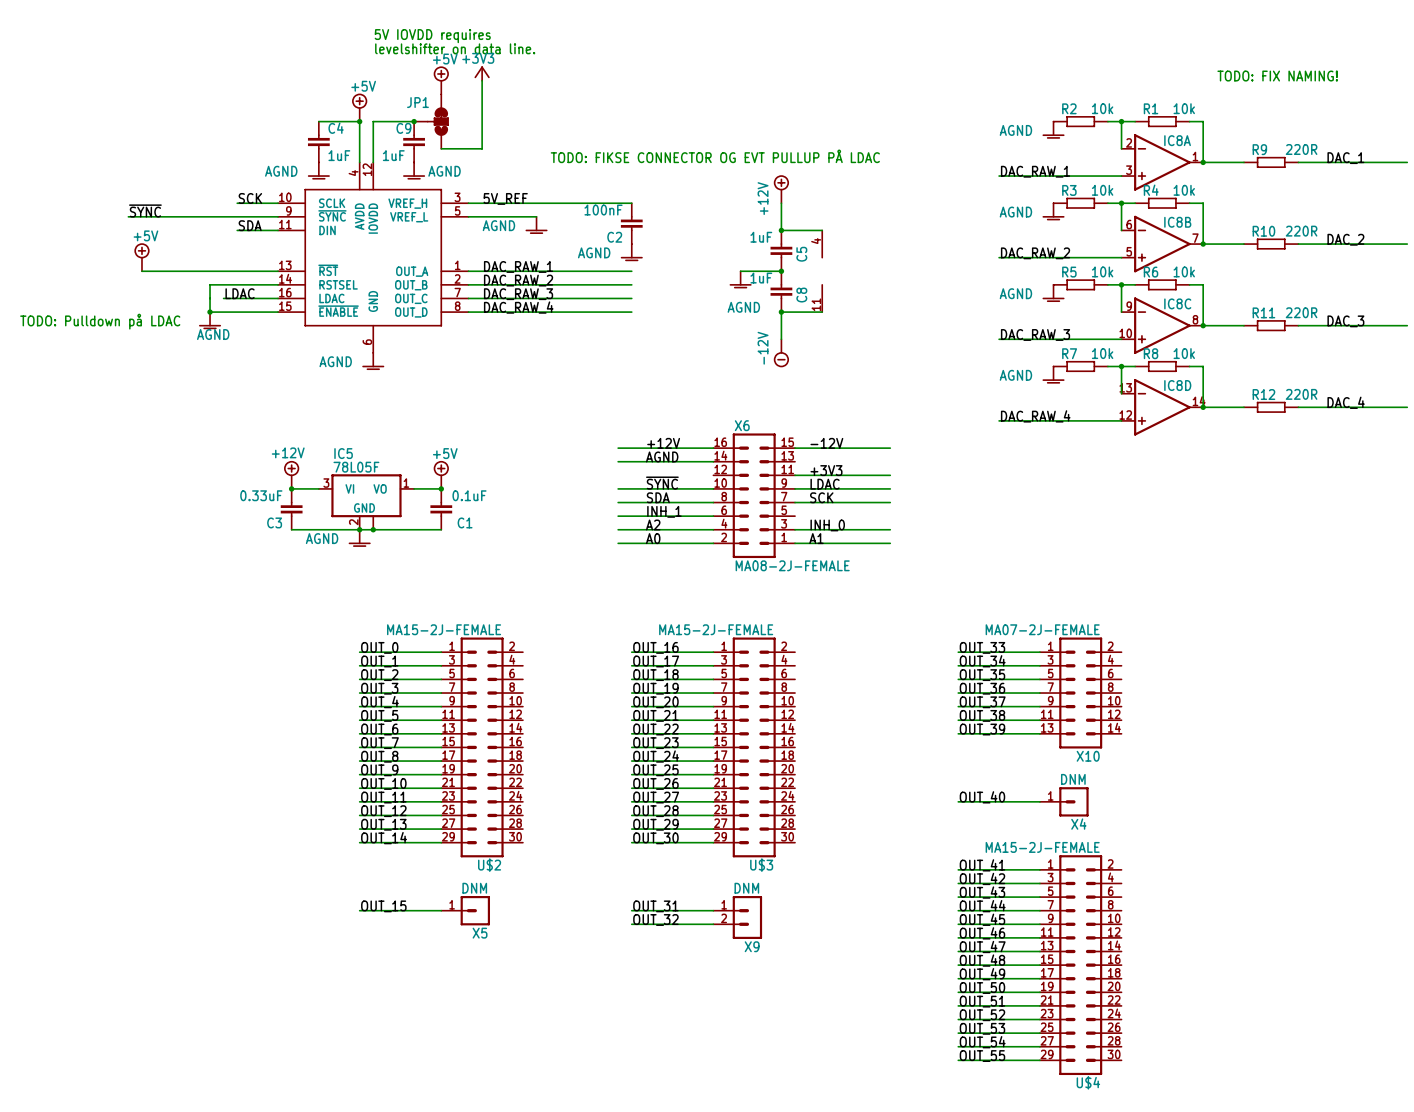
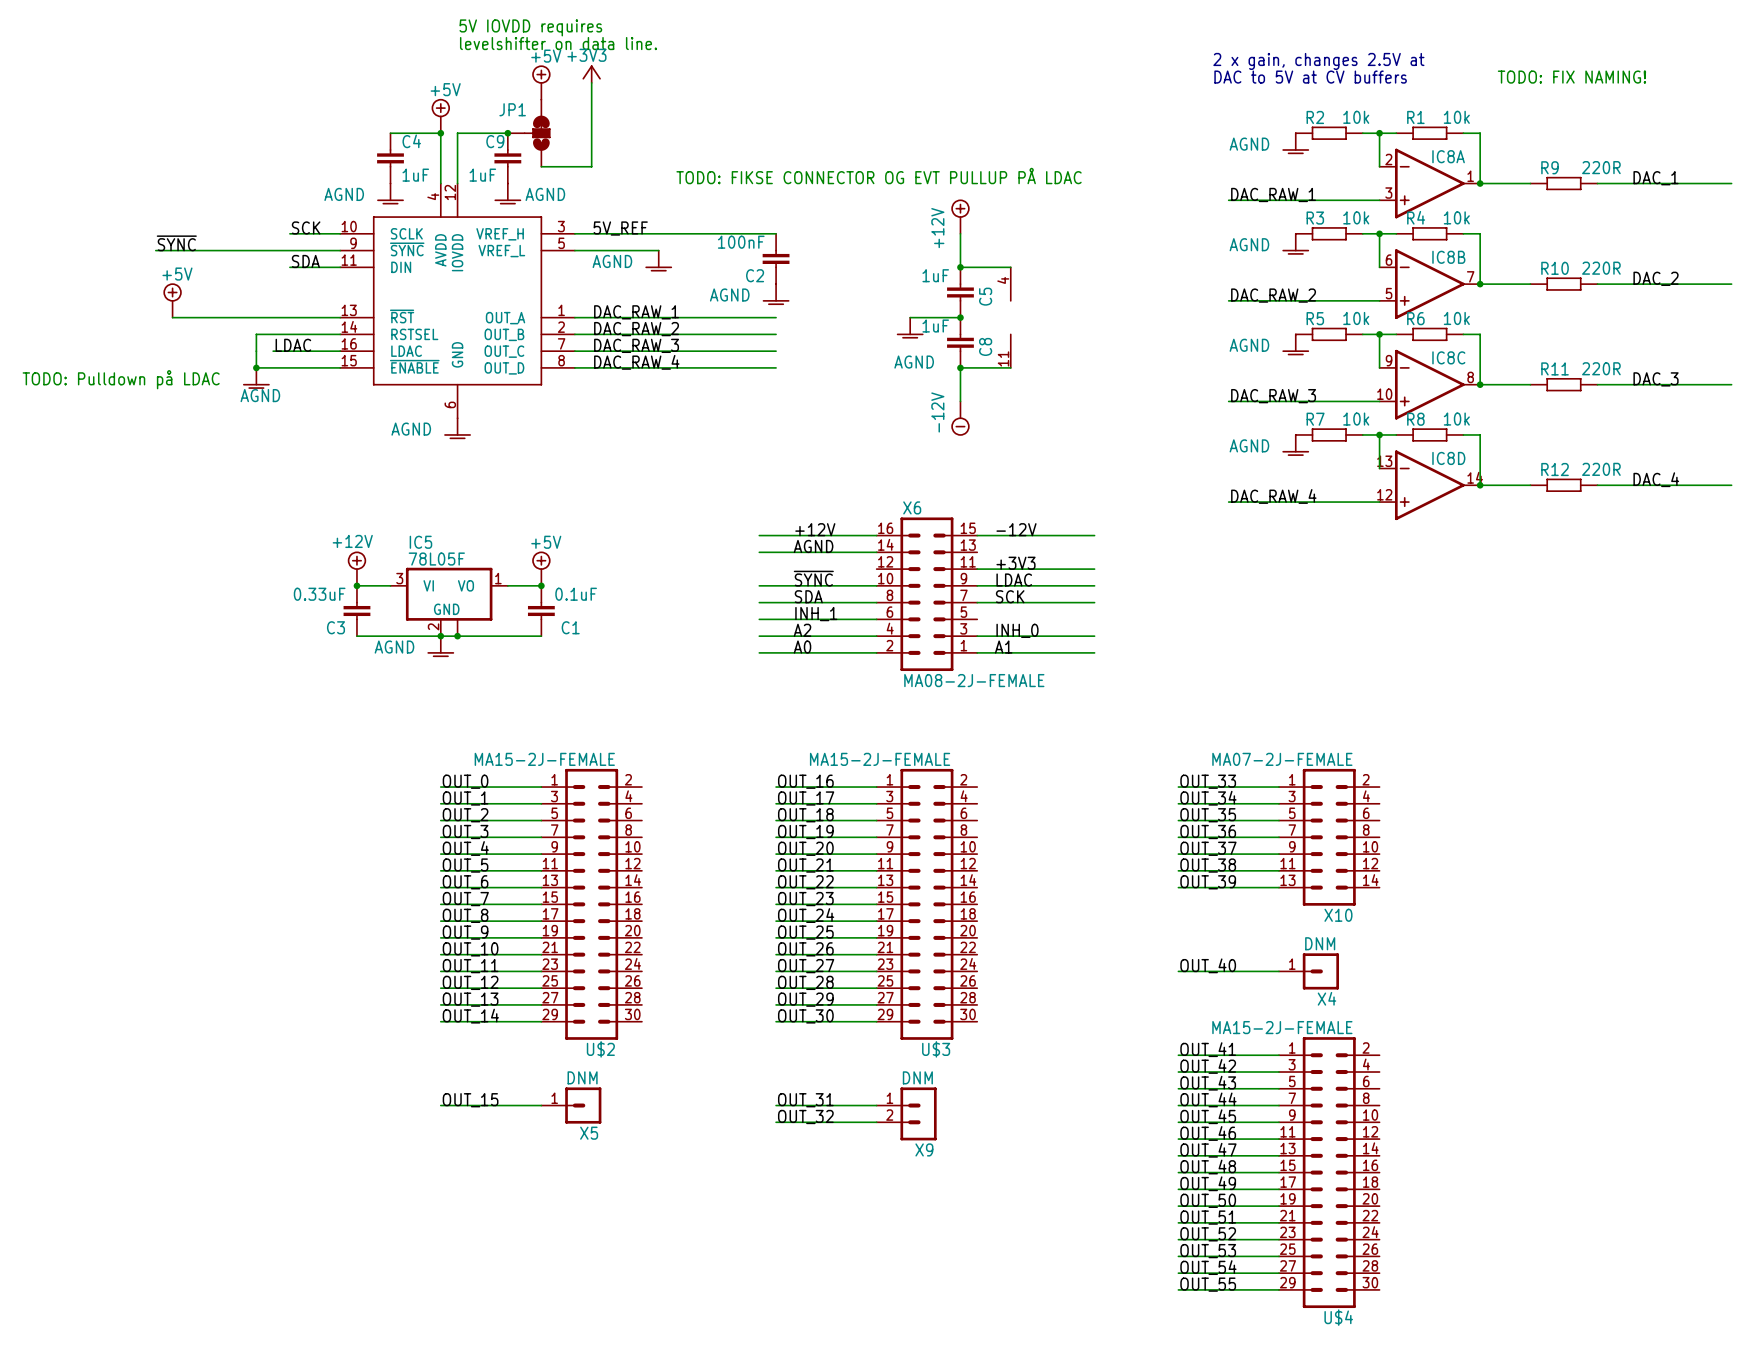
text: none -> 2 x gain, changes 2.5V at (1318, 61)
text: none -> DAC to 5V at CV buffers (1310, 77)

